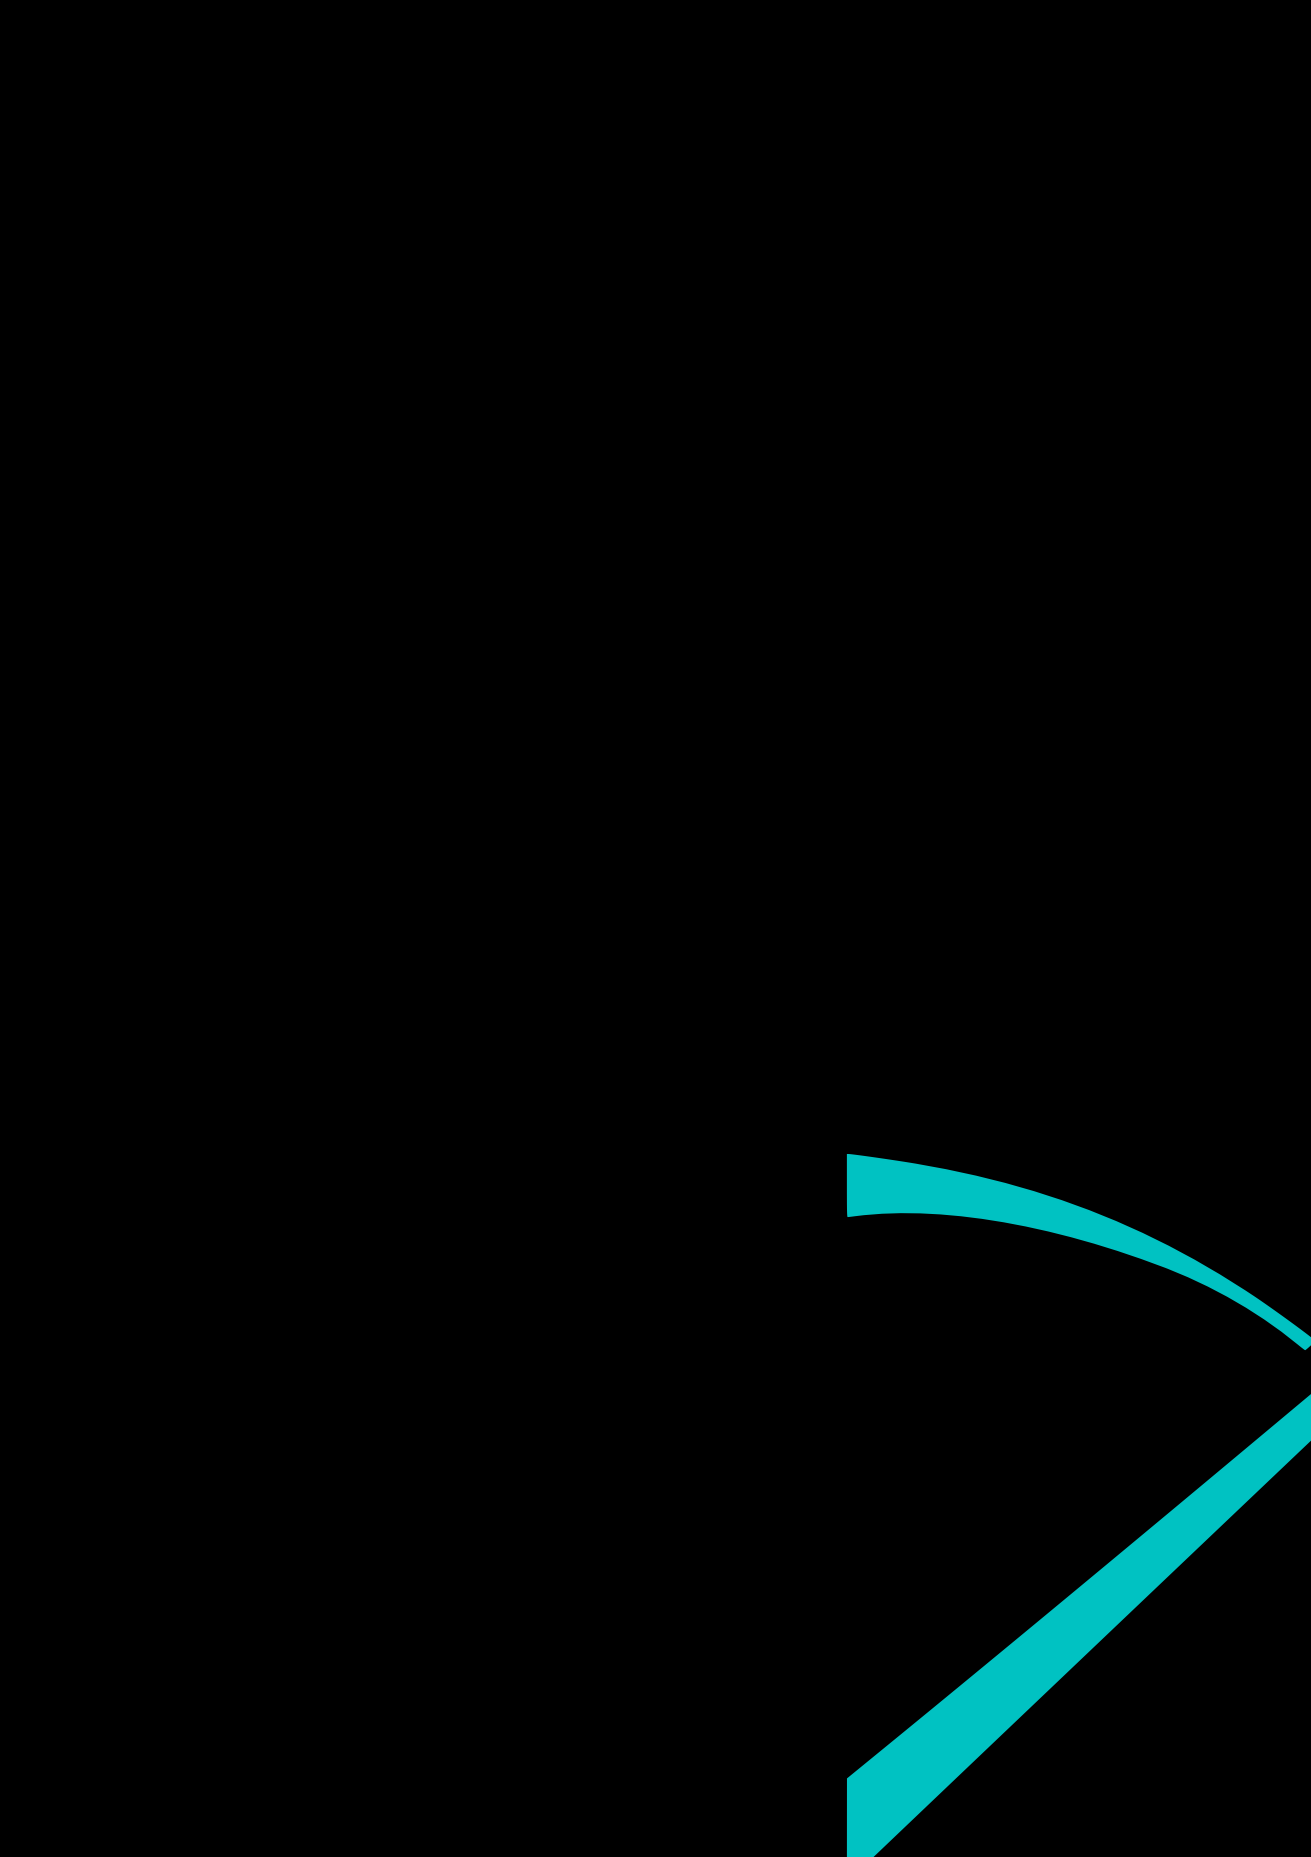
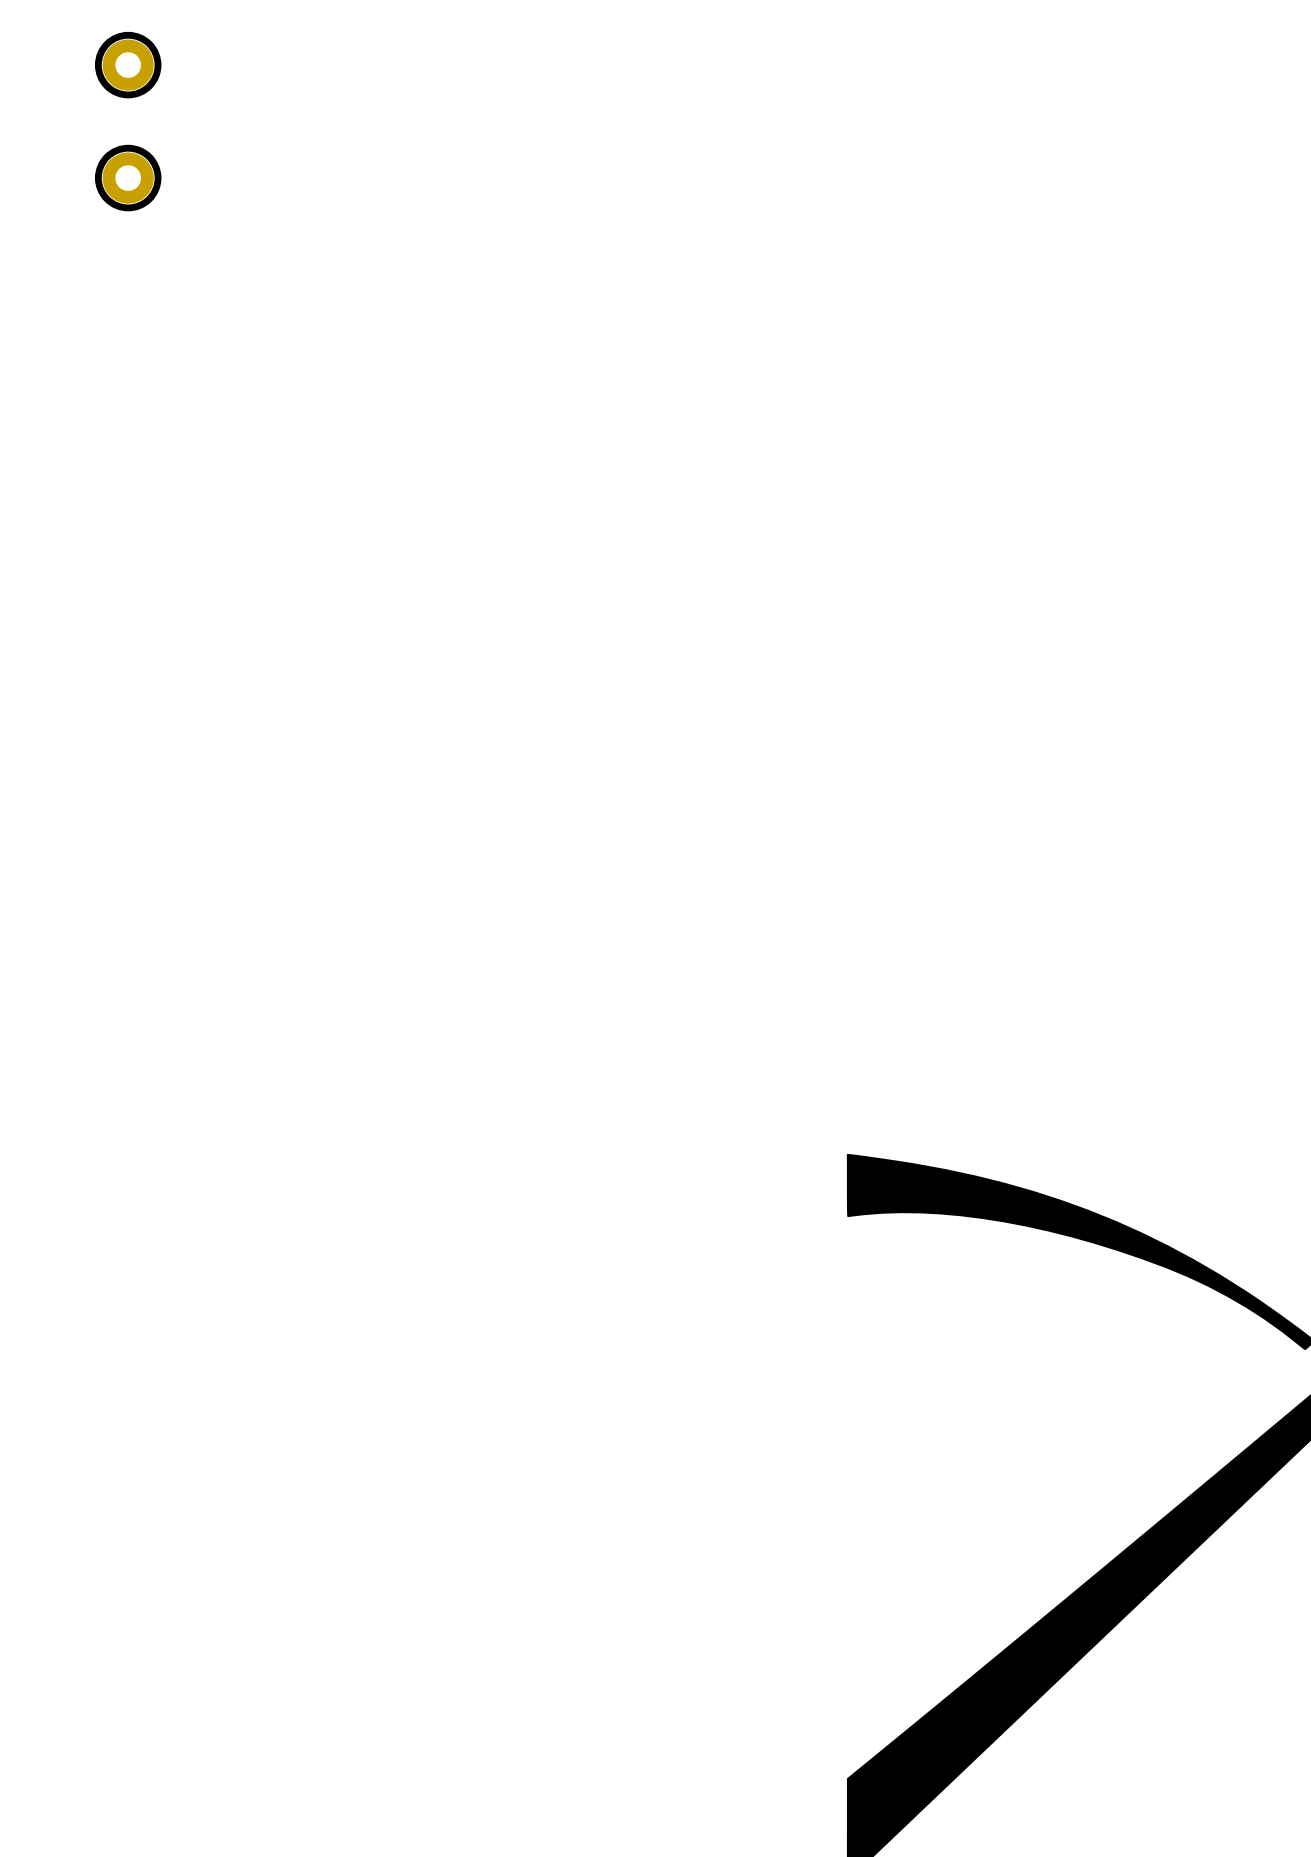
part: none -> (128, 65)
part: none -> (128, 178)

